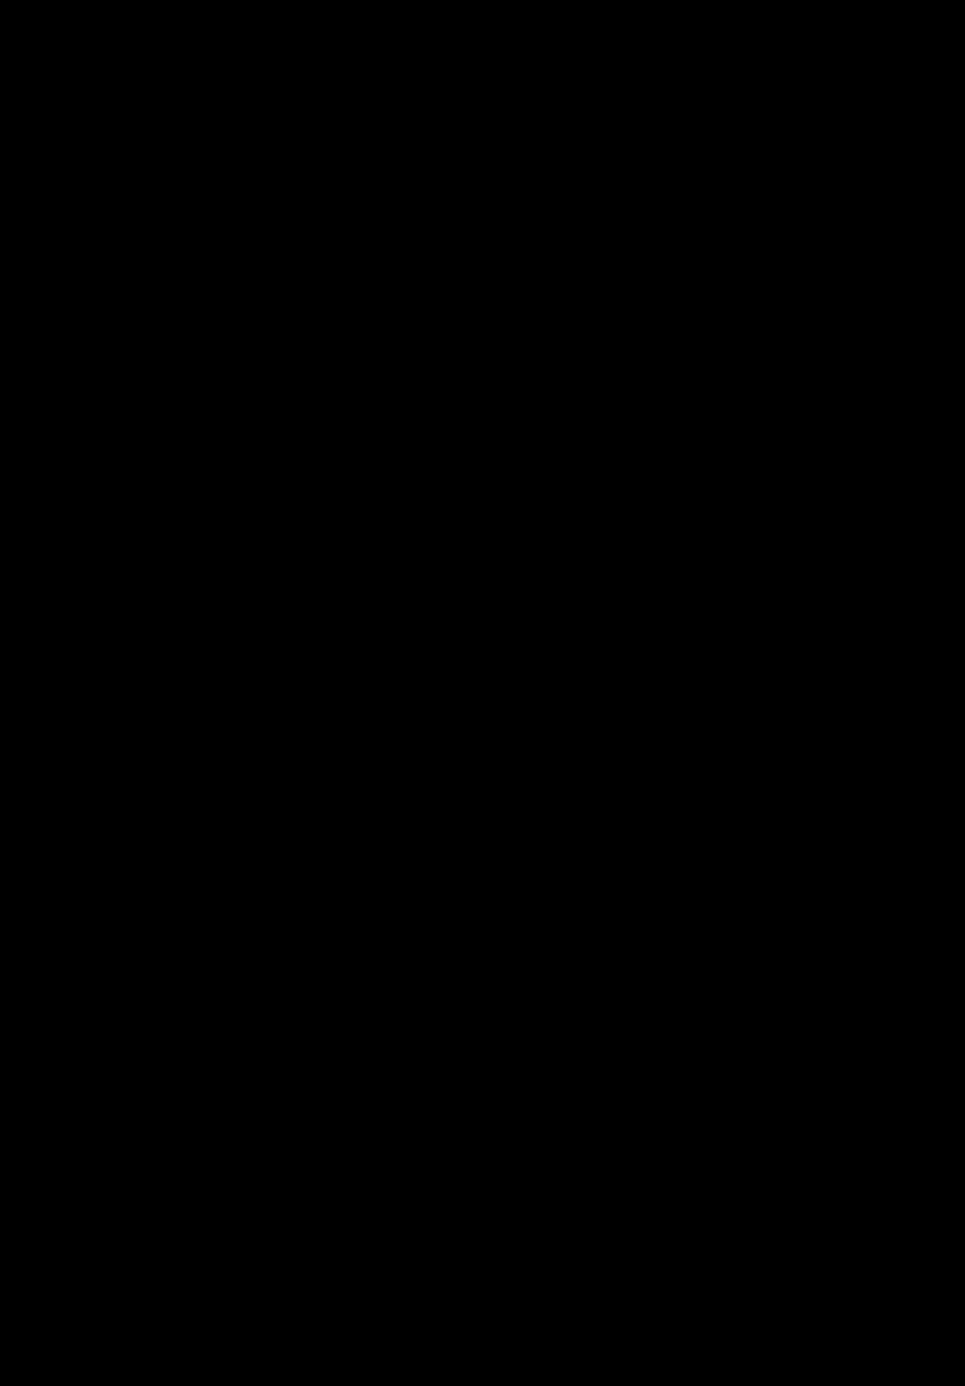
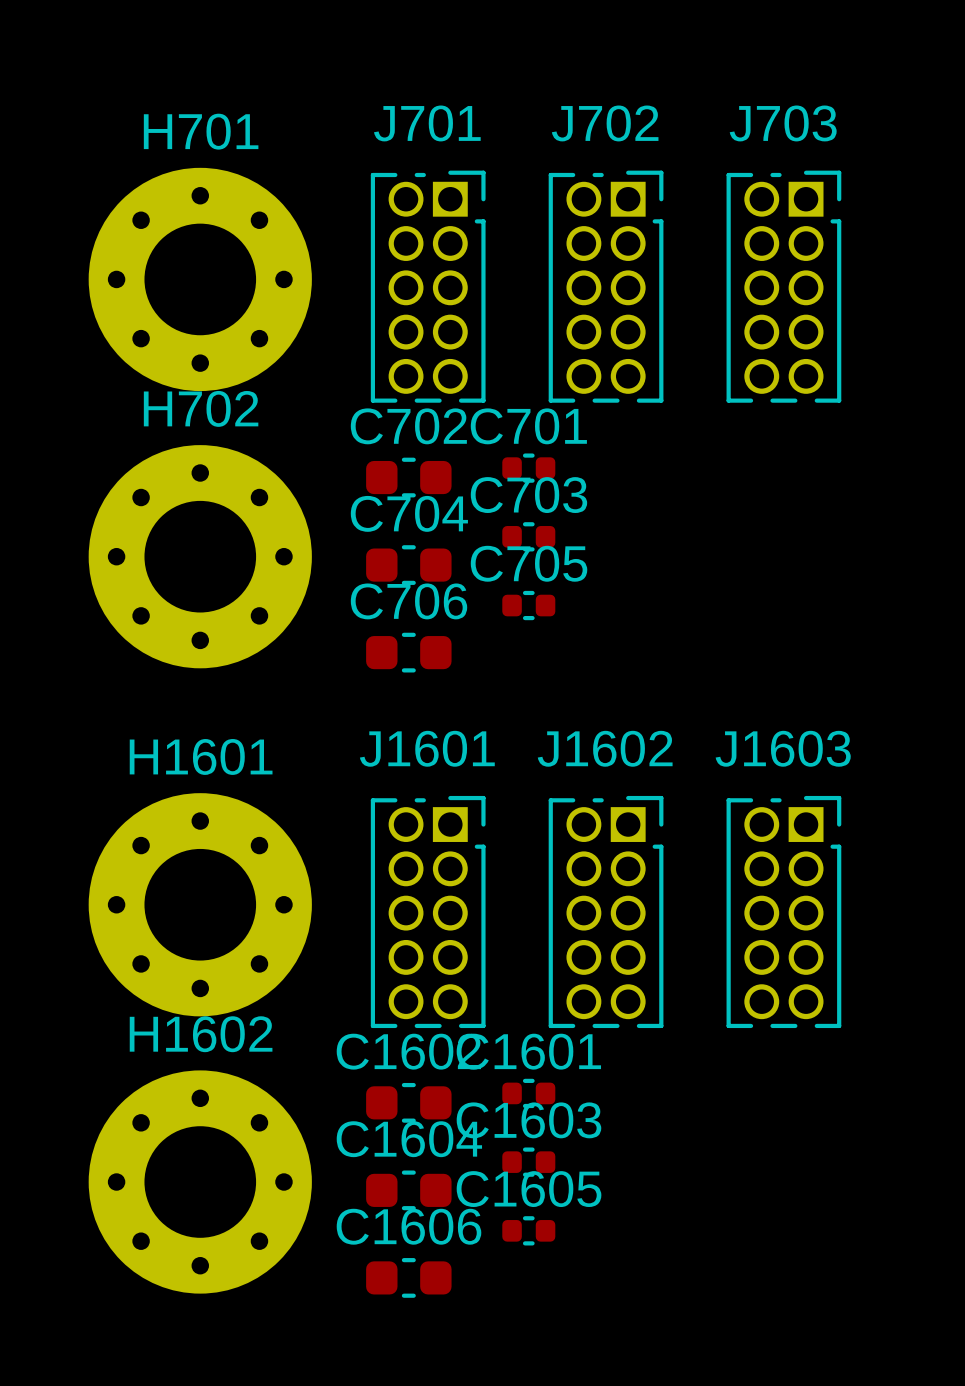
H701: none -> (200, 279)
J701: none -> (428, 286)
J702: none -> (606, 286)
J703: none -> (783, 286)
C701: none -> (528, 468)
C702: none -> (408, 477)
C703: none -> (528, 536)
H702: none -> (200, 556)
C704: none -> (408, 565)
C705: none -> (528, 605)
C706: none -> (408, 652)
H1601: none -> (200, 904)
J1601: none -> (428, 911)
J1602: none -> (606, 911)
J1603: none -> (783, 911)
C1601: none -> (528, 1093)
C1602: none -> (408, 1102)
C1603: none -> (528, 1162)
H1602: none -> (200, 1182)
C1604: none -> (408, 1190)
C1605: none -> (528, 1230)
C1606: none -> (408, 1277)

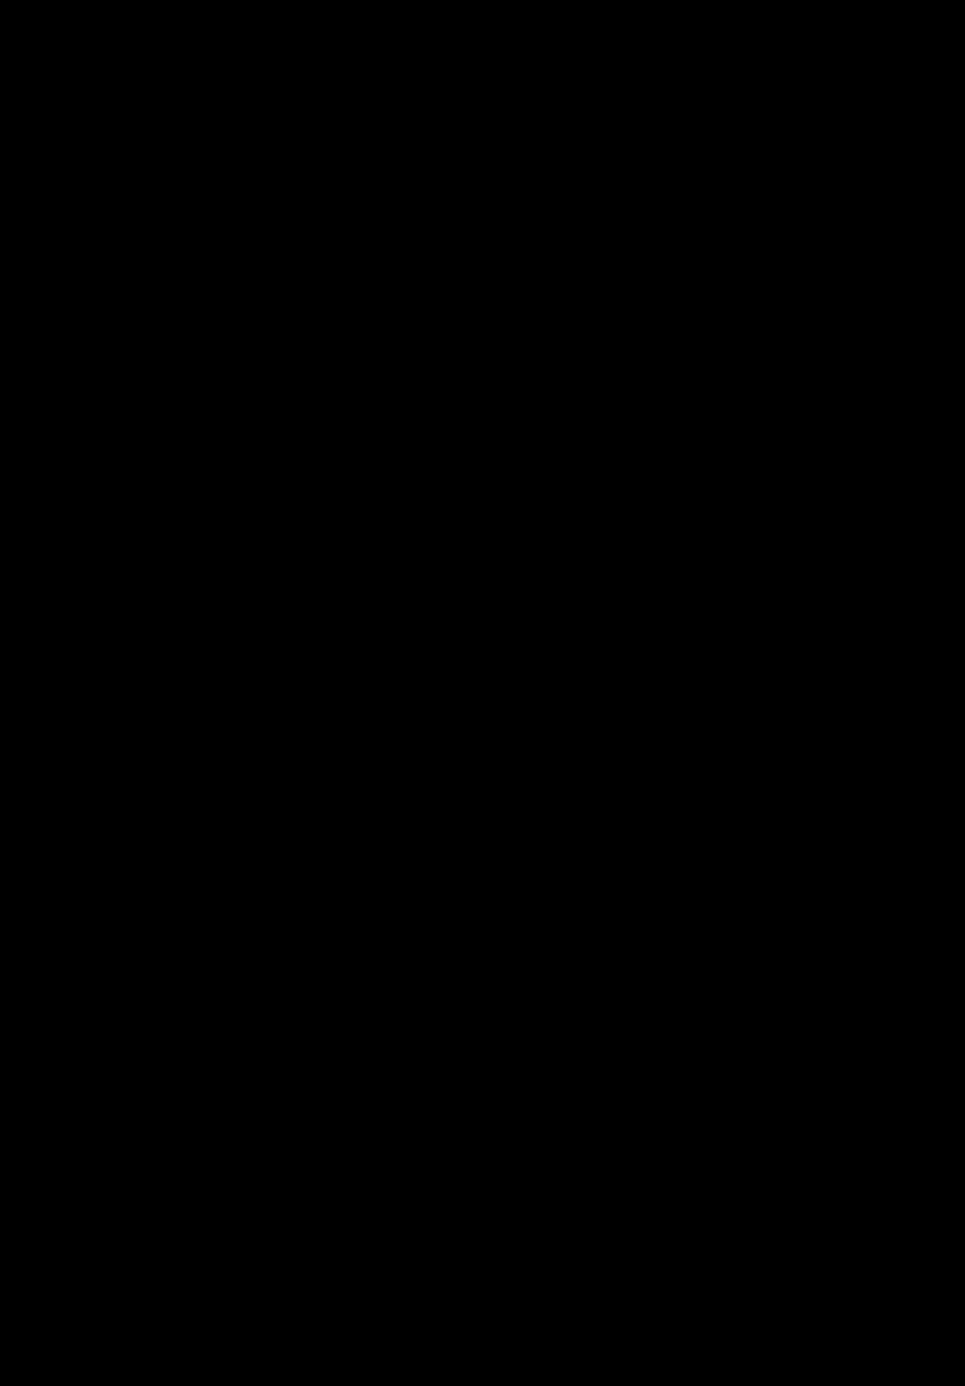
H701: (200, 279) -> none
J701: (428, 286) -> none
J702: (606, 286) -> none
J703: (783, 286) -> none
C701: (528, 468) -> none
C702: (408, 477) -> none
C703: (528, 536) -> none
H702: (200, 556) -> none
C704: (408, 565) -> none
C705: (528, 605) -> none
C706: (408, 652) -> none
H1601: (200, 904) -> none
J1601: (428, 911) -> none
J1602: (606, 911) -> none
J1603: (783, 911) -> none
C1601: (528, 1093) -> none
C1602: (408, 1102) -> none
C1603: (528, 1162) -> none
H1602: (200, 1182) -> none
C1604: (408, 1190) -> none
C1605: (528, 1230) -> none
C1606: (408, 1277) -> none

